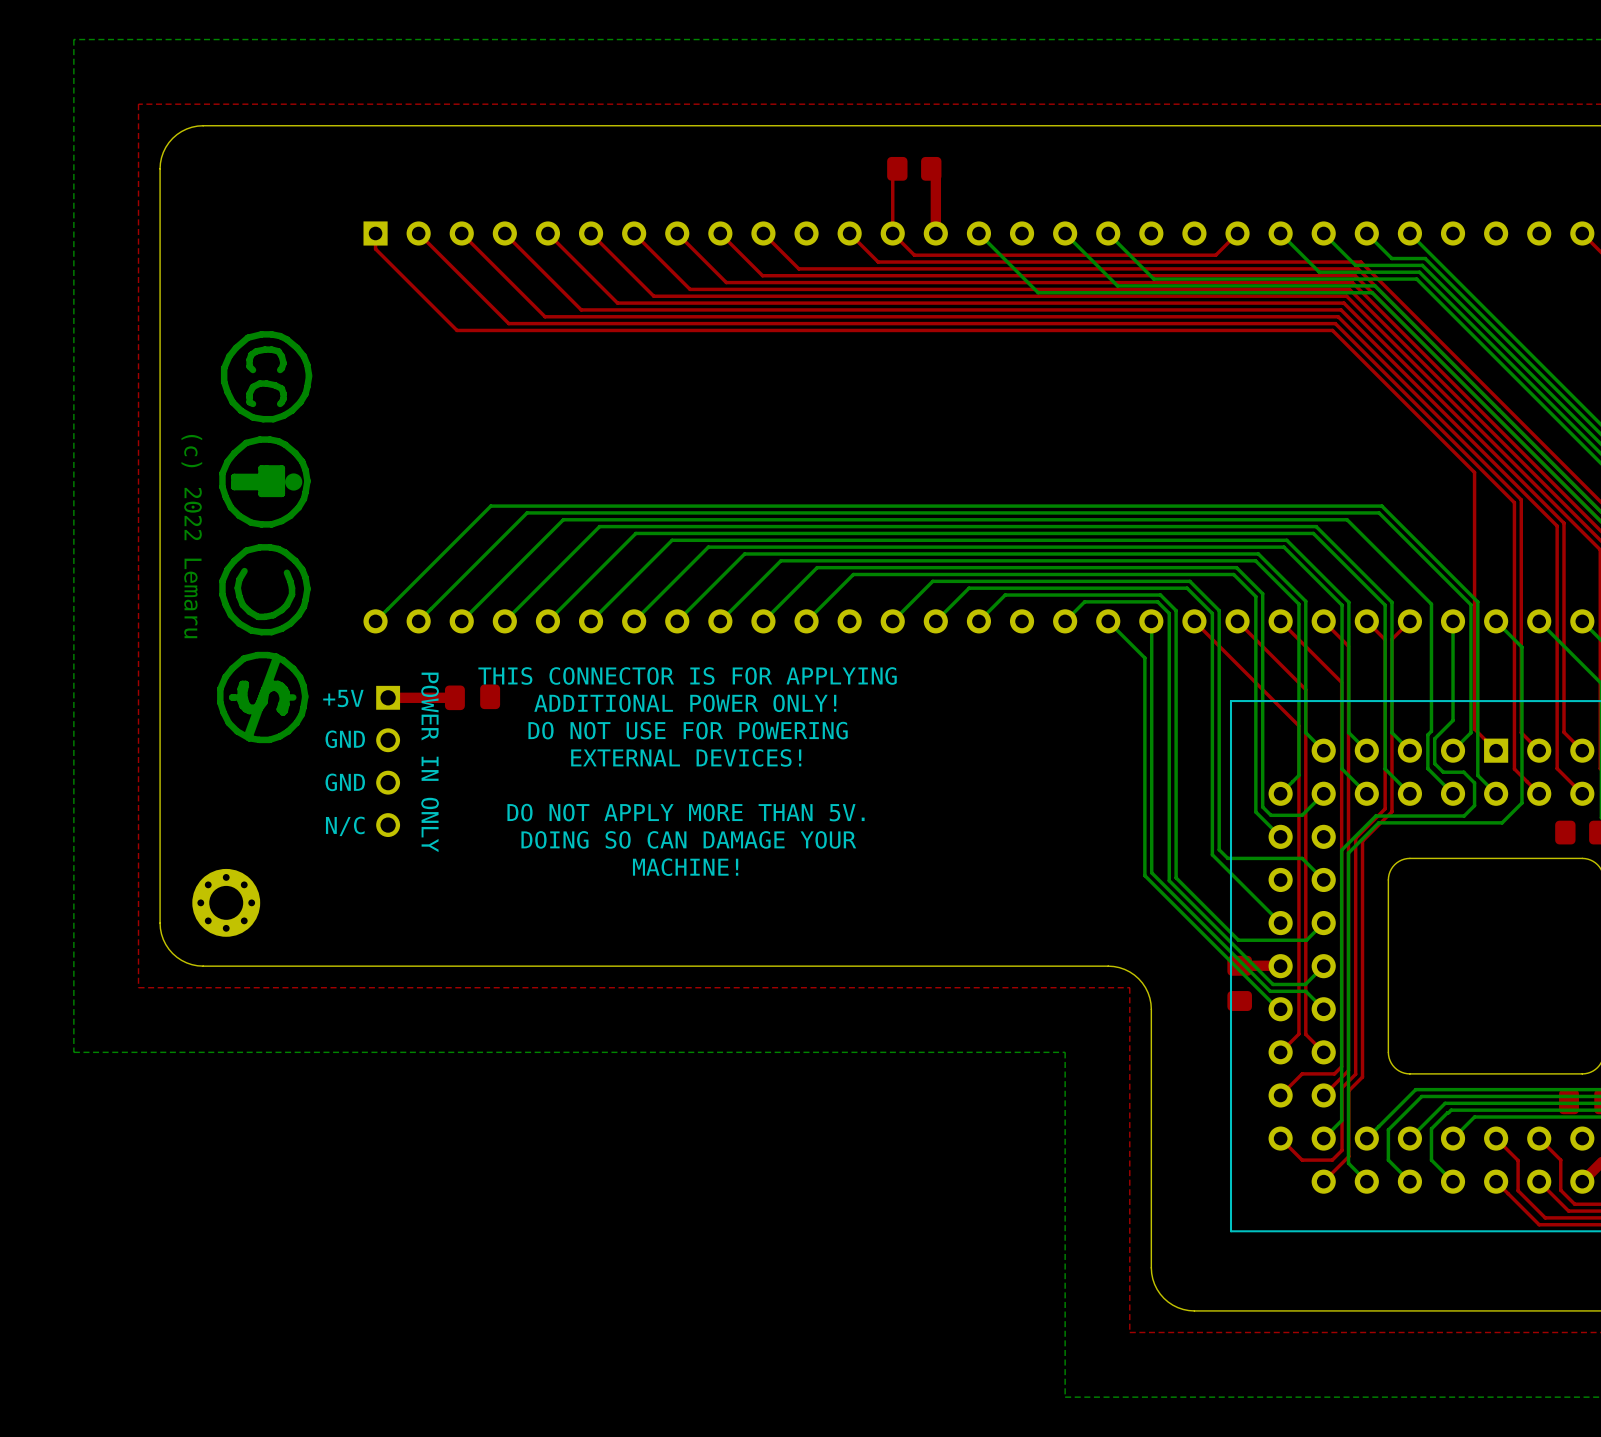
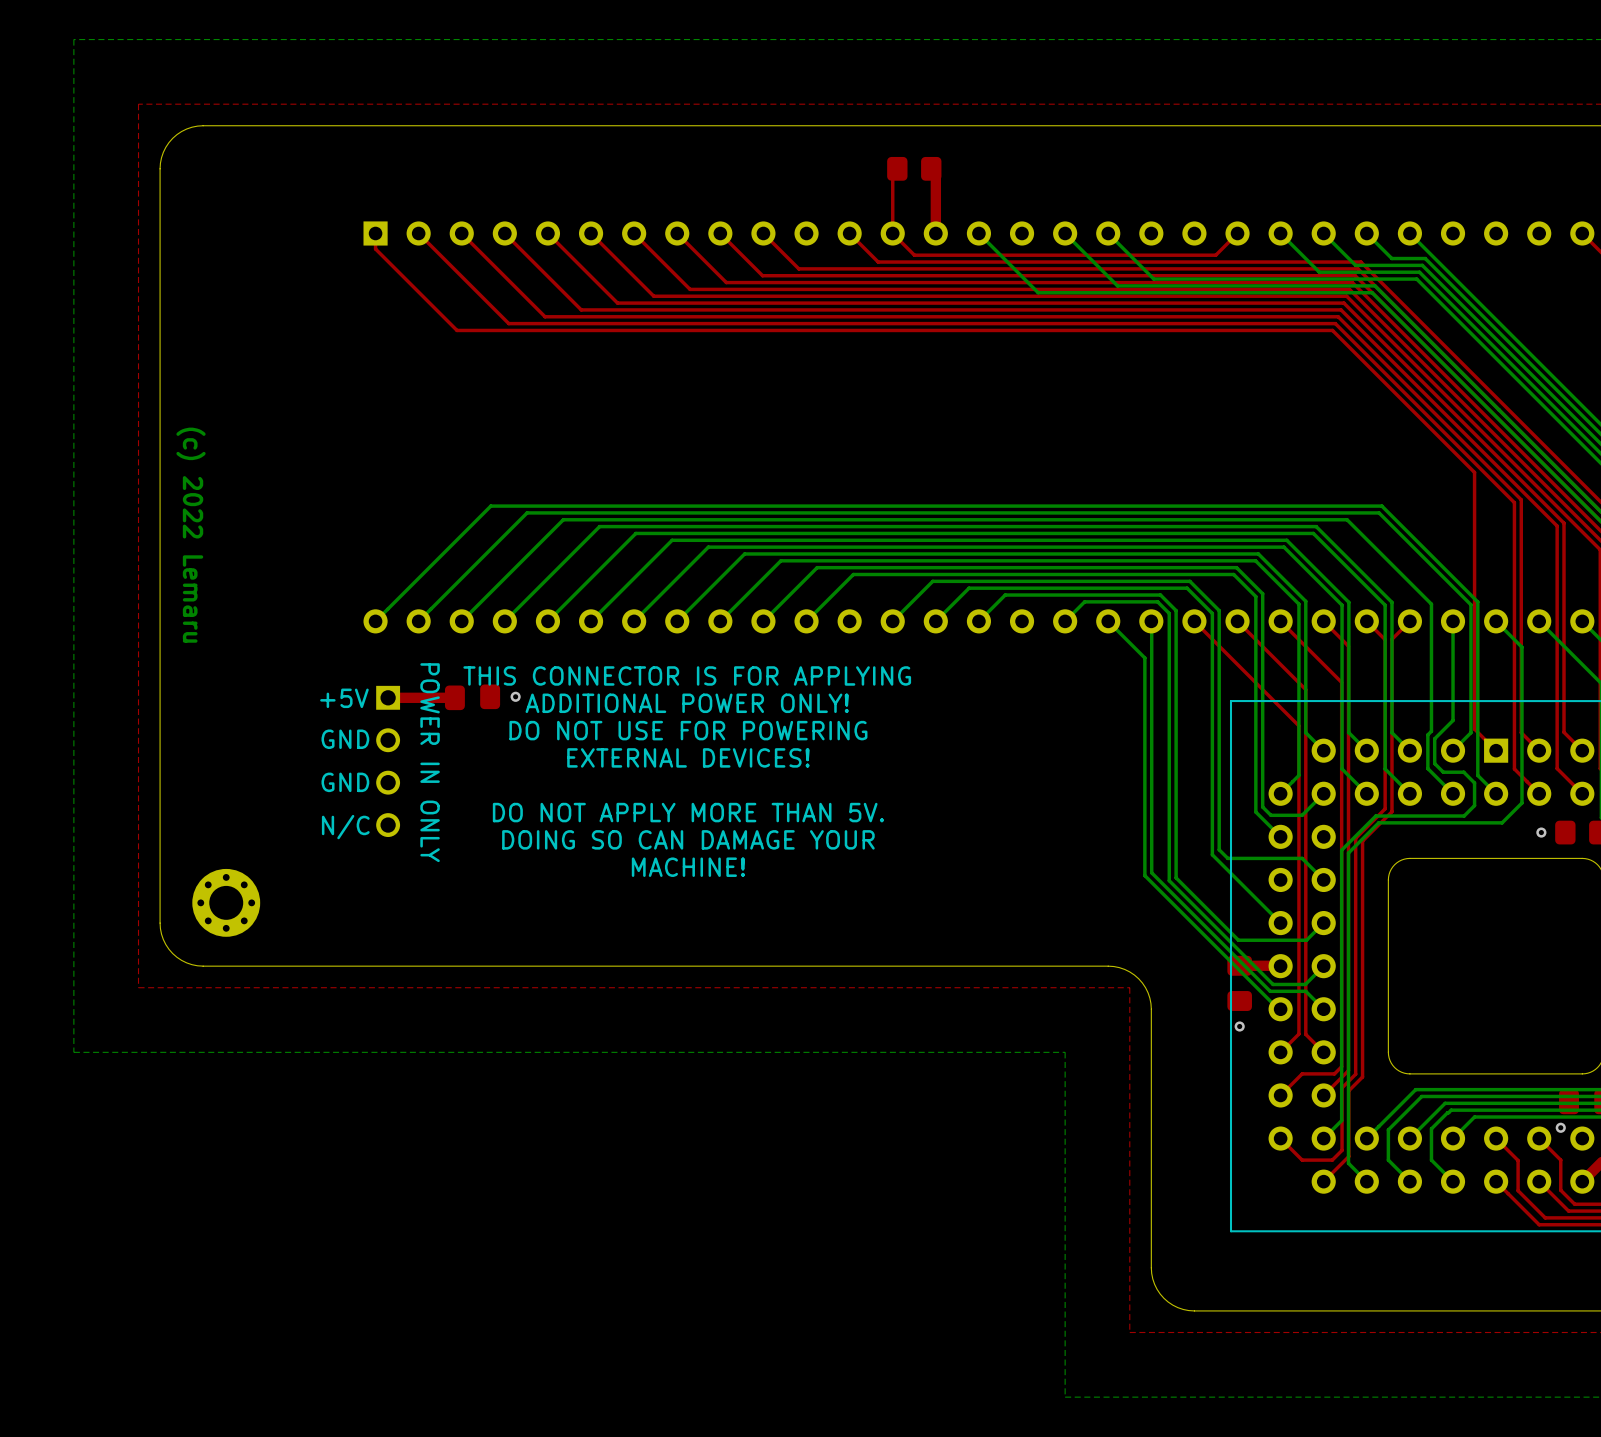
drawing: [217, 331, 313, 744] -> none
via: none -> (515, 696)
via: none -> (1541, 832)
via: none -> (1239, 1026)
via: none -> (1560, 1127)

